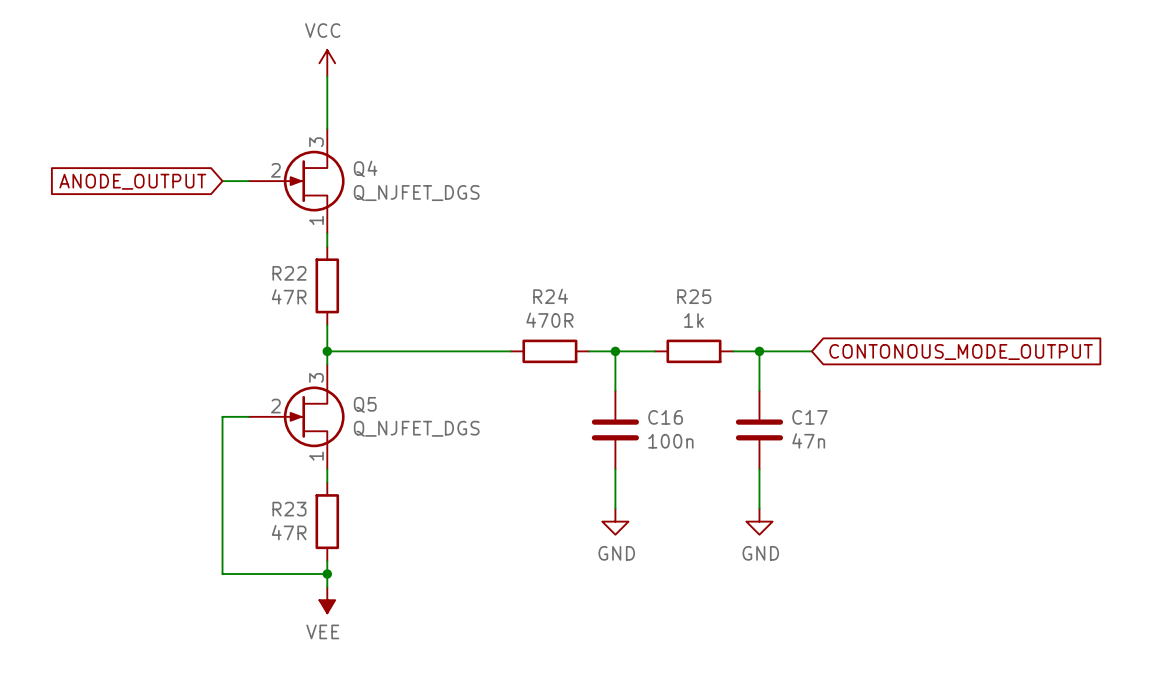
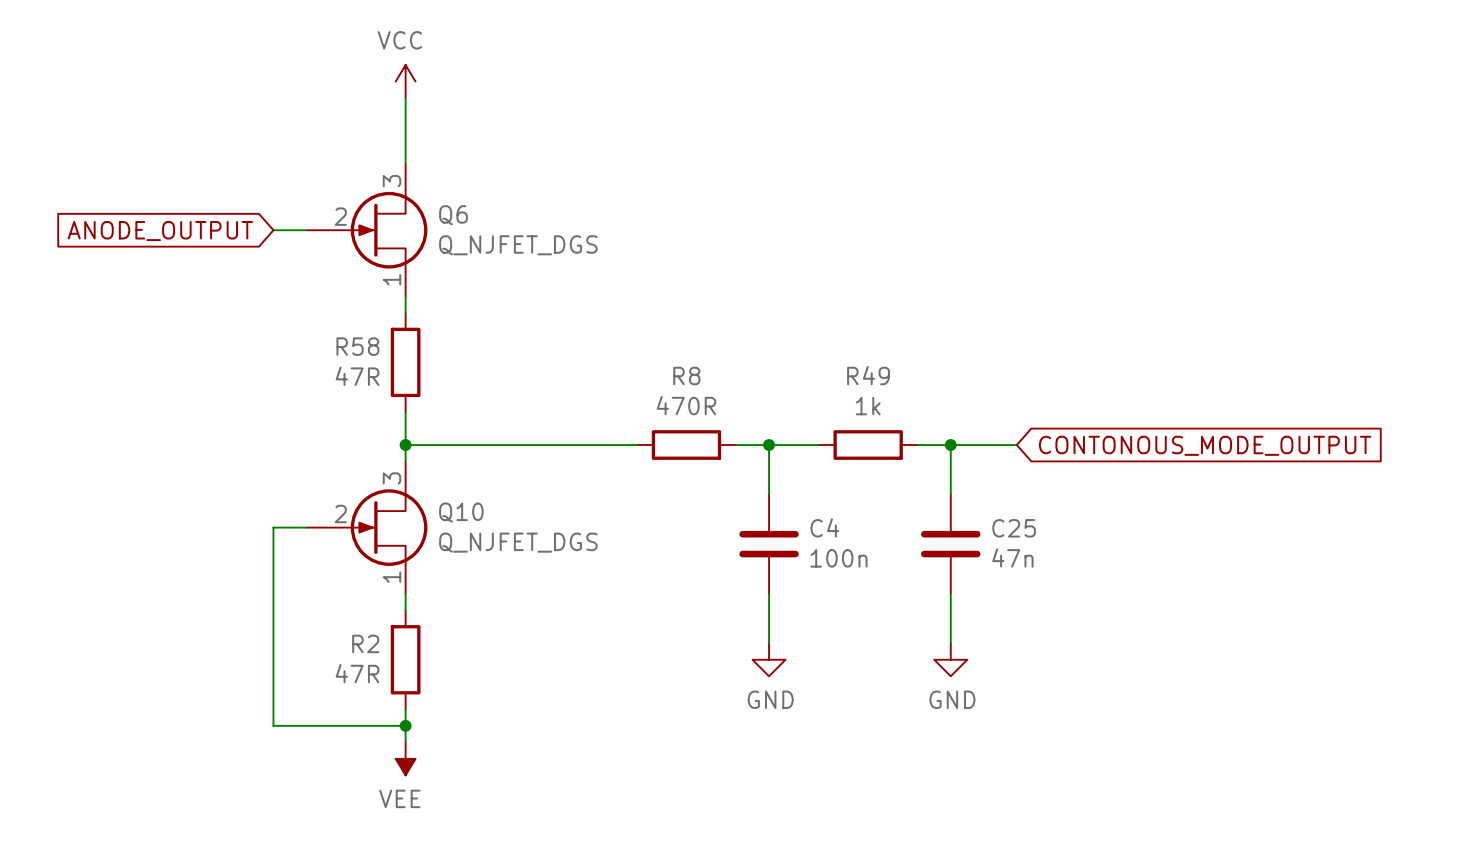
Q4 name: Q4 (365, 168) -> Q6 (453, 215)
R22 name: R22 (289, 273) -> R58 (357, 346)
R24 name: R24 (550, 296) -> R8 (686, 375)
R25 name: R25 (694, 296) -> R49 (868, 375)
Q5 name: Q5 (365, 404) -> Q10 (461, 512)
C16 name: C16 (665, 417) -> C4 (824, 527)
C17 name: C17 (809, 417) -> C25 (1014, 528)
R23 name: R23 (289, 509) -> R2 (365, 643)

